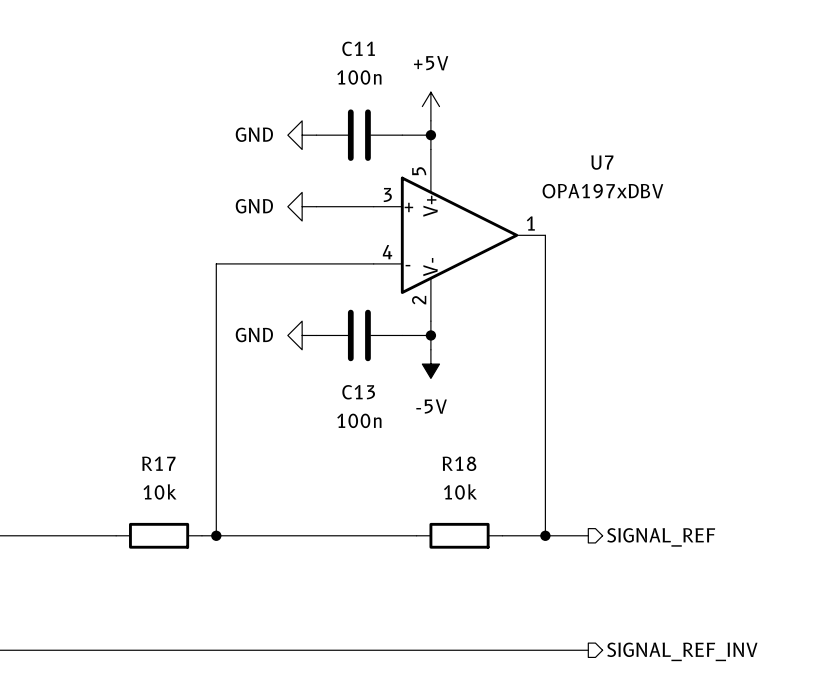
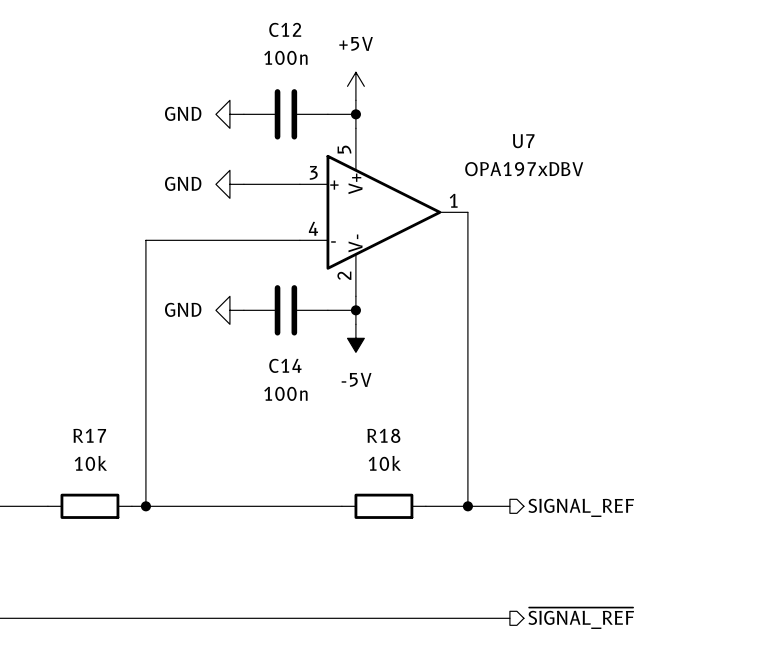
C11 name: C11 (358, 48) -> C12 (285, 29)
C13 name: C13 (358, 392) -> C14 (285, 365)
hierarchical label: SIGNAL_REF_INV (682, 651) -> ~{SIGNAL_REF} (581, 618)

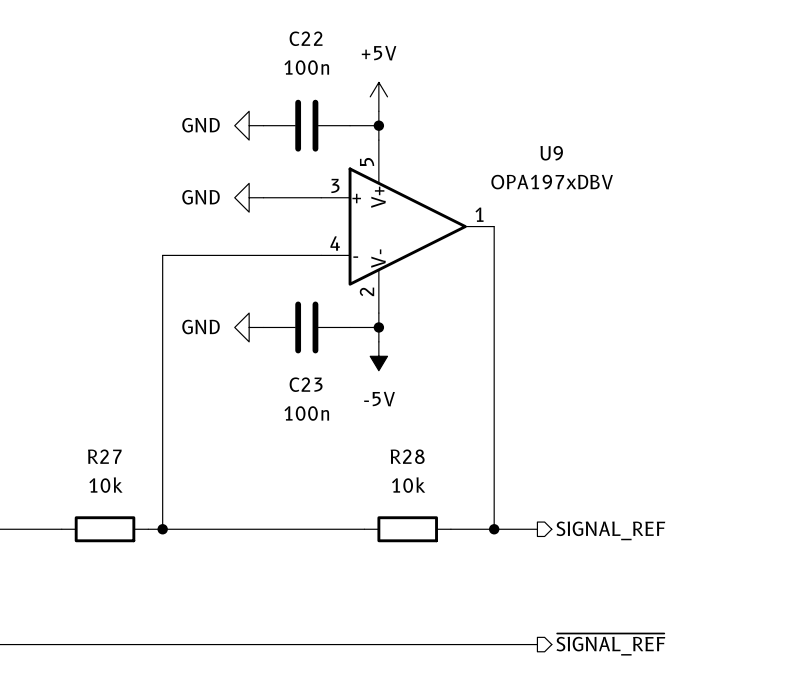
C12 name: C12 (285, 29) -> C22 (306, 38)
U7 name: U7 (523, 141) -> U9 (551, 153)
C14 name: C14 (285, 365) -> C23 (306, 384)
R17 name: R17 (89, 435) -> R27 (104, 456)
R18 name: R18 (383, 435) -> R28 (407, 456)

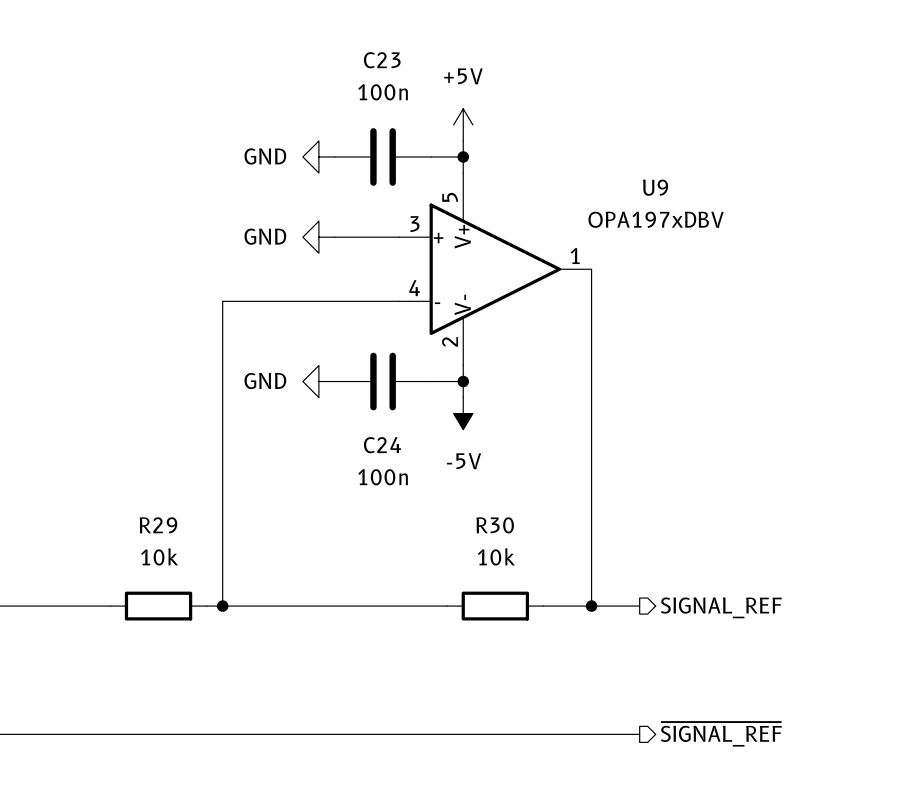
C22 name: C22 (306, 38) -> C23 (382, 60)
C23 name: C23 (306, 384) -> C24 (382, 445)
R27 name: R27 (104, 456) -> R29 (158, 525)
R28 name: R28 (407, 456) -> R30 (495, 525)

